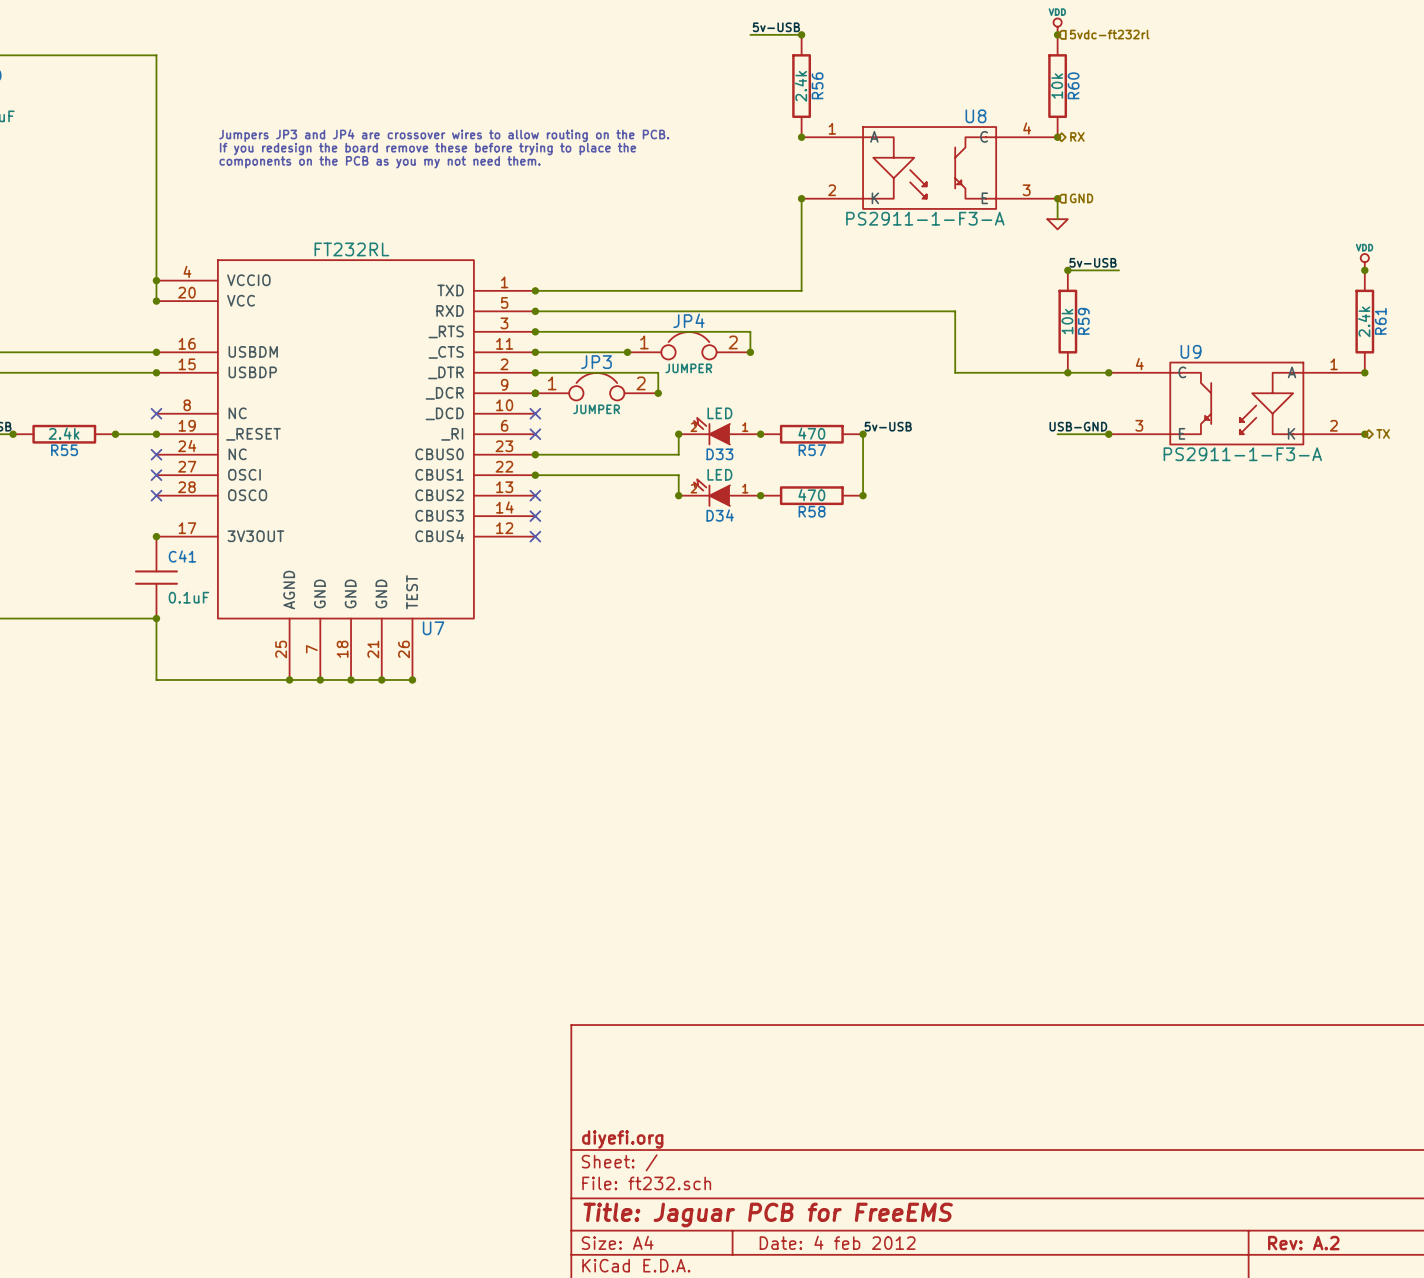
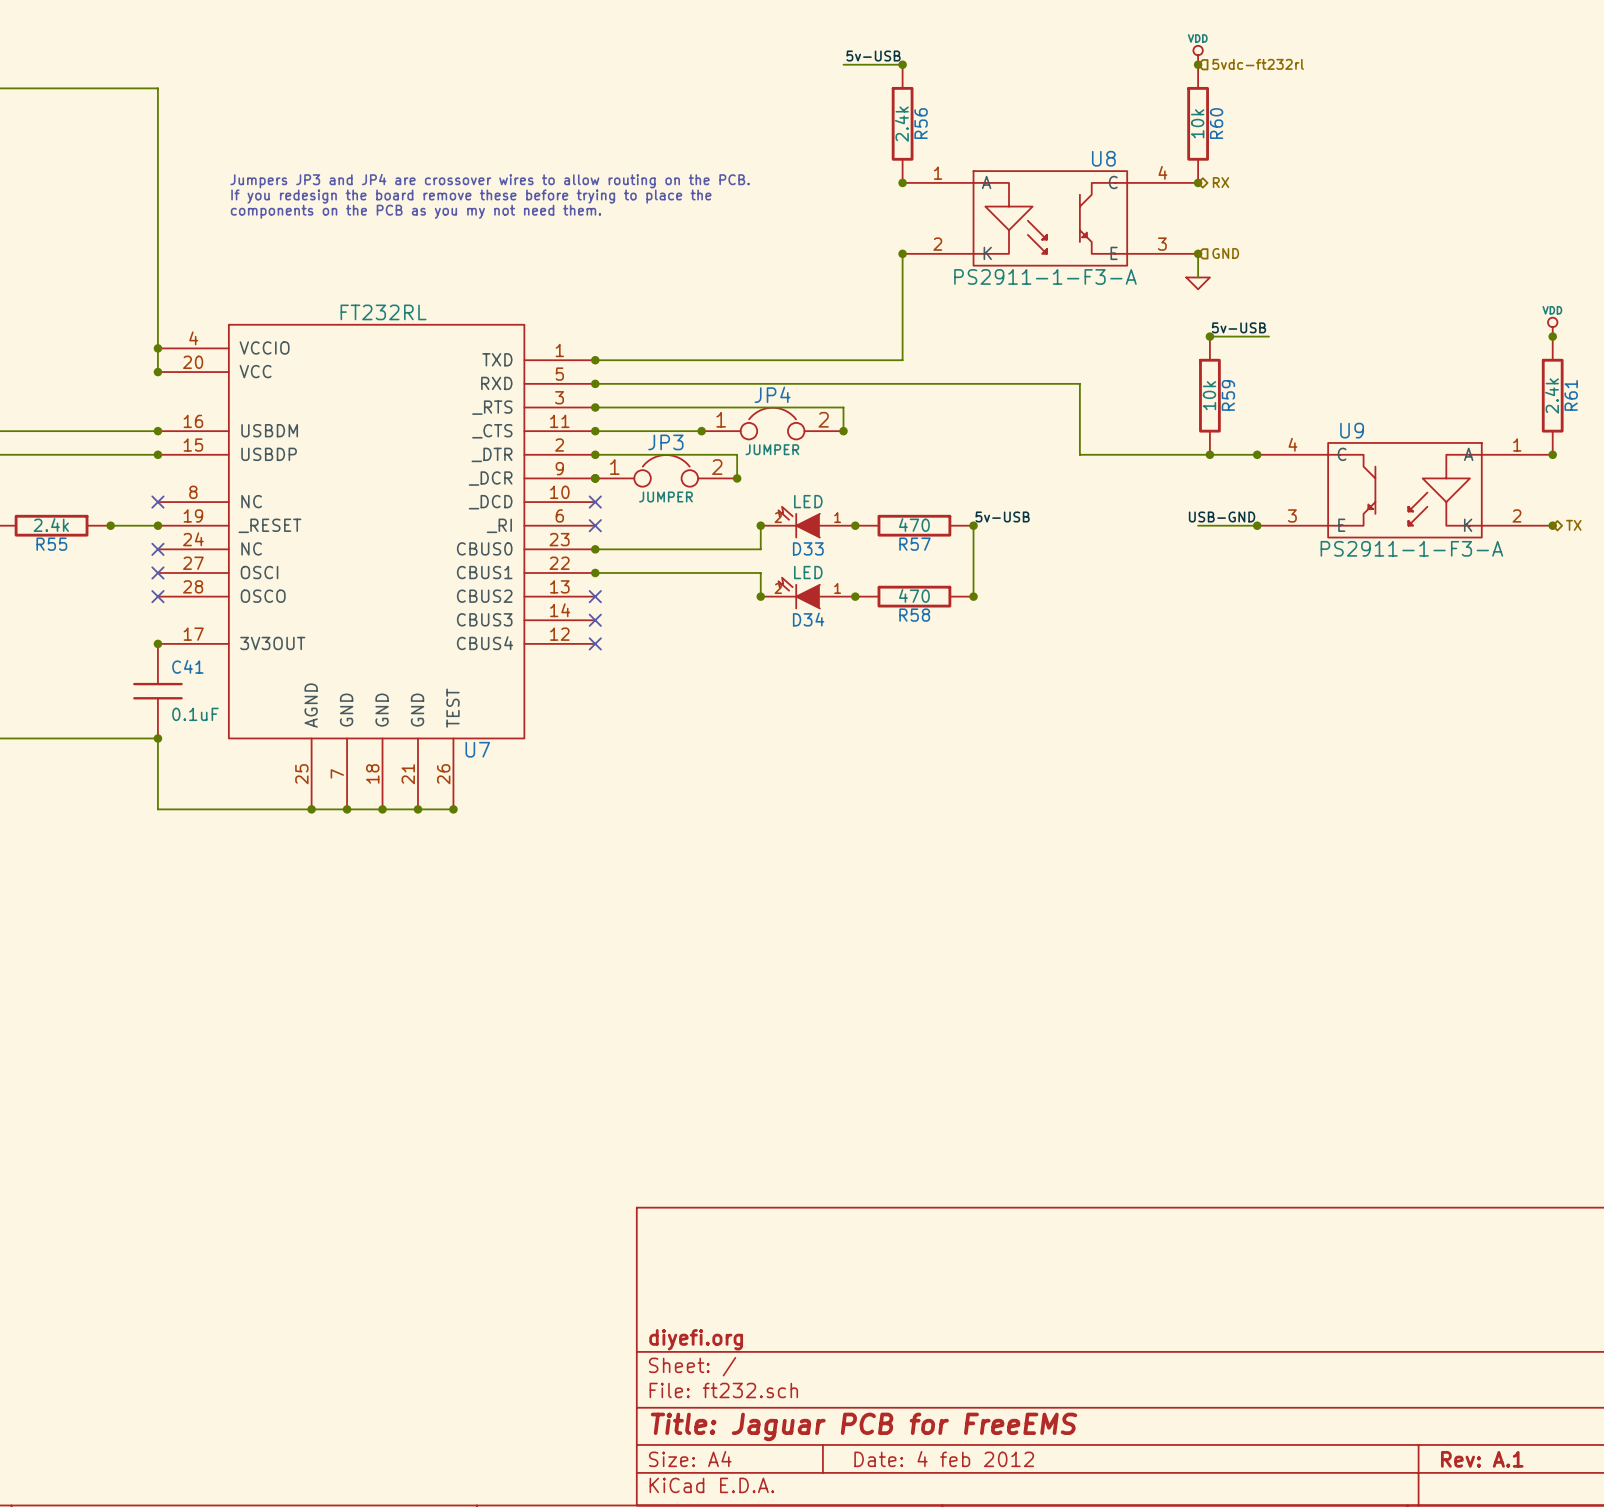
title block: Rev: A.2 (1303, 1243) -> Rev: A.1 (1482, 1459)

